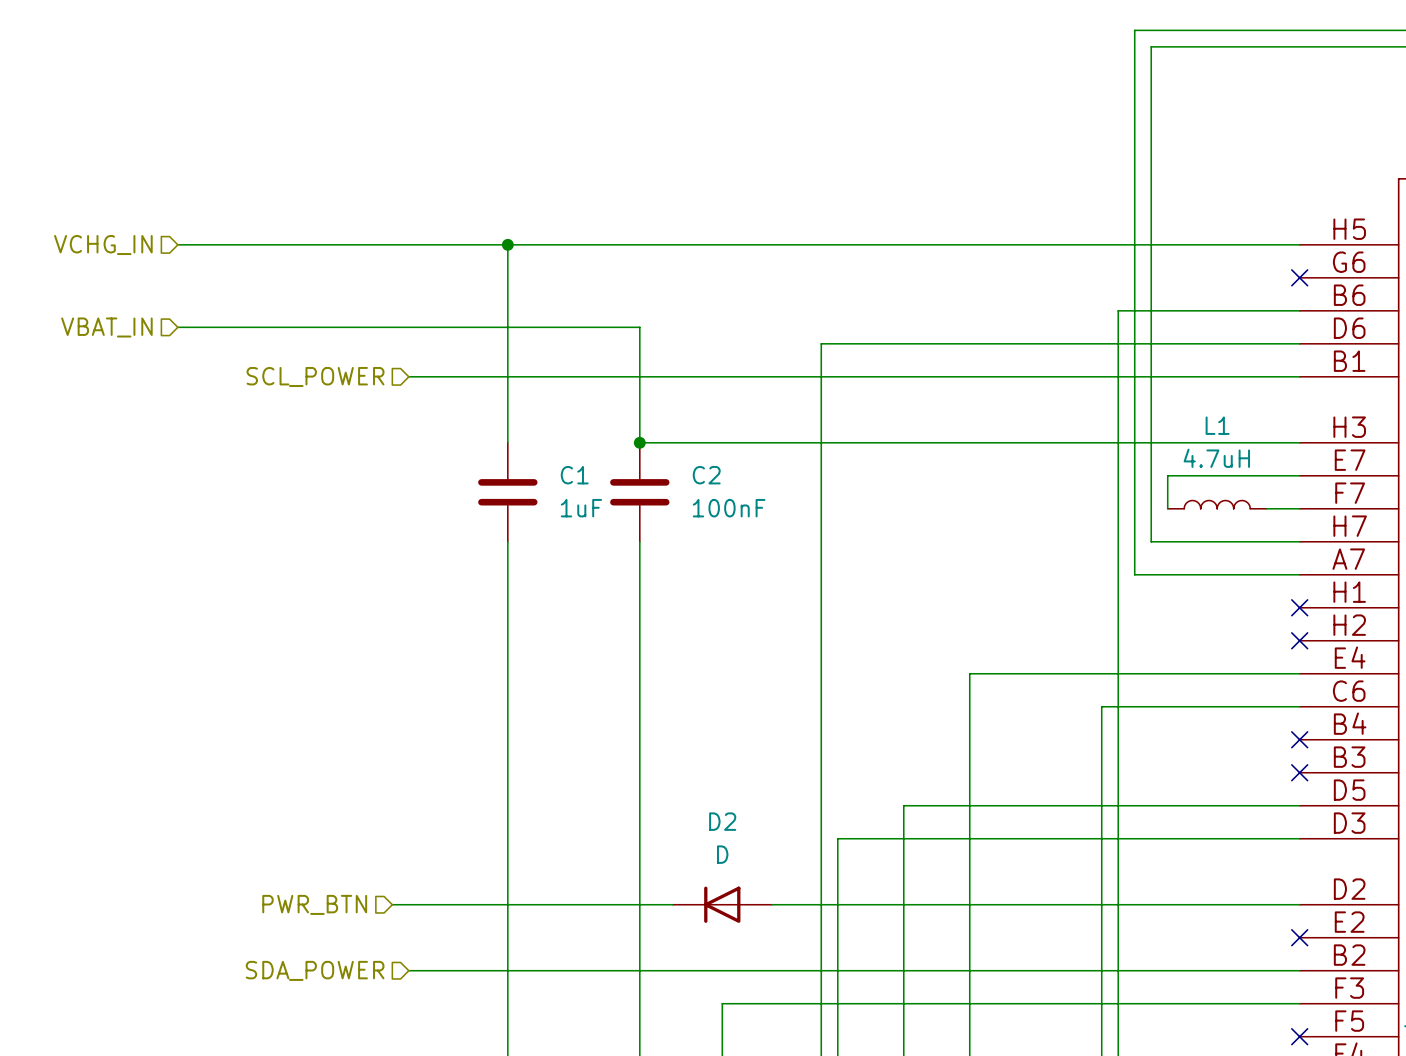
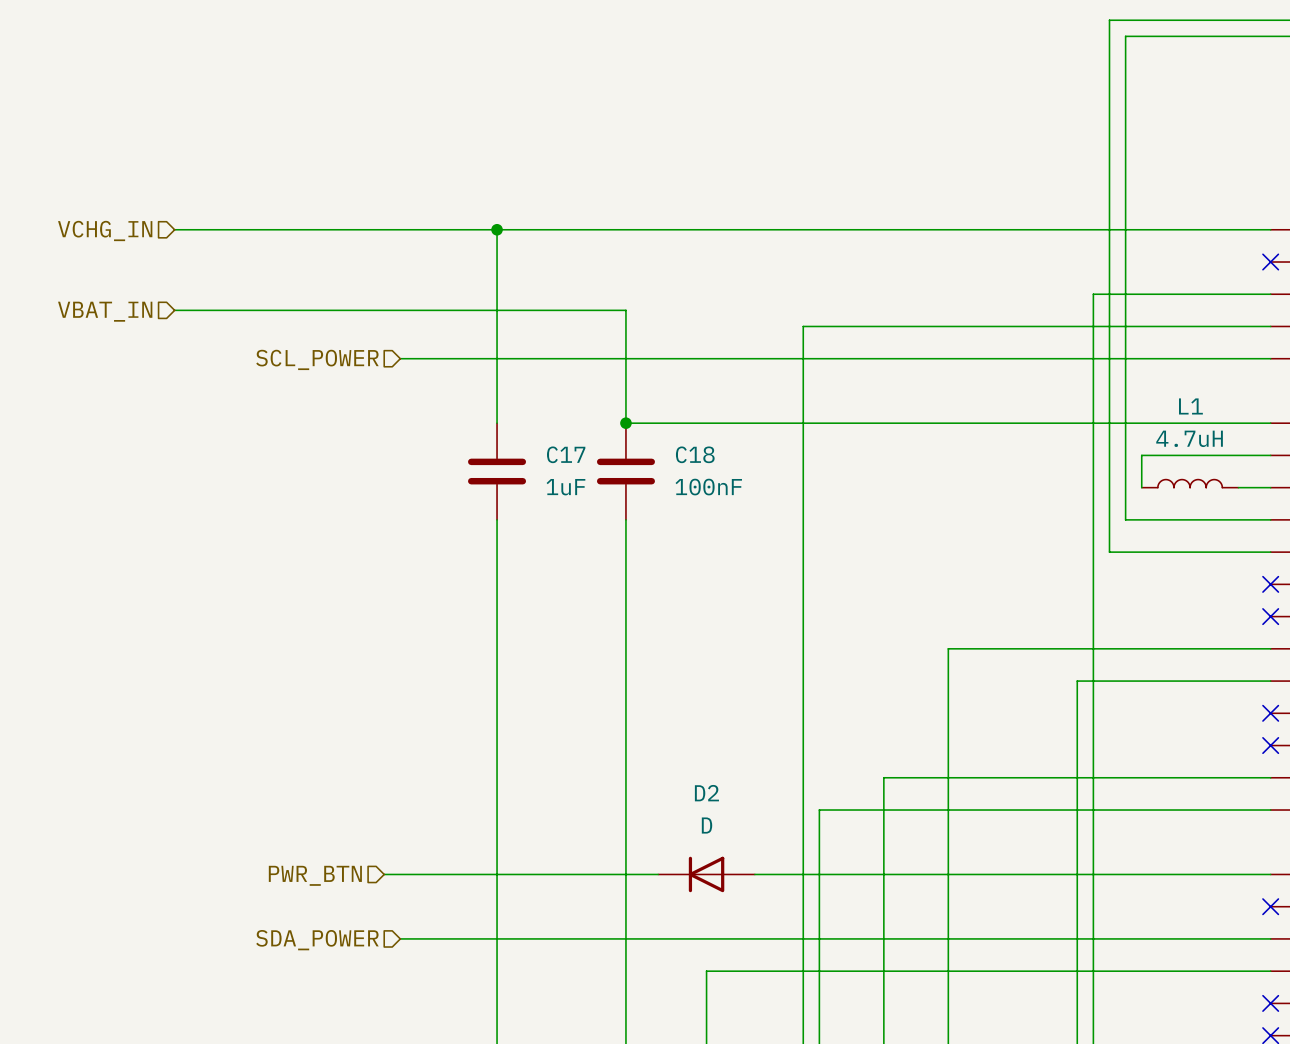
C1 name: C1 (574, 475) -> C17 (566, 454)
C2 name: C2 (706, 475) -> C18 (695, 454)

